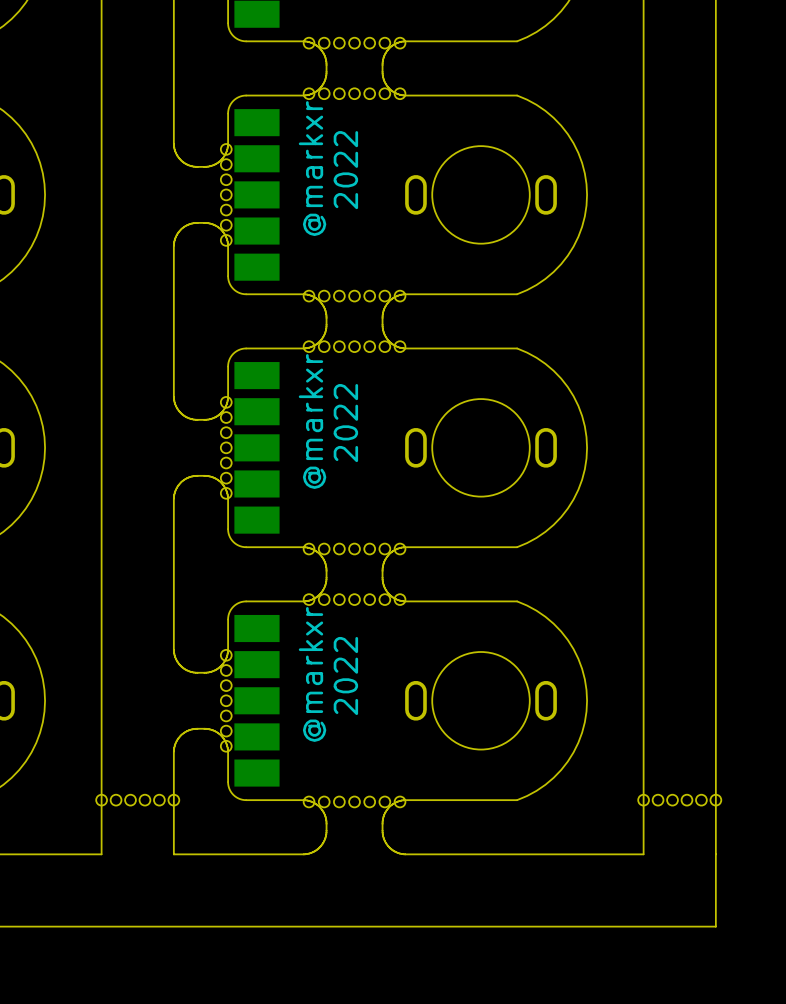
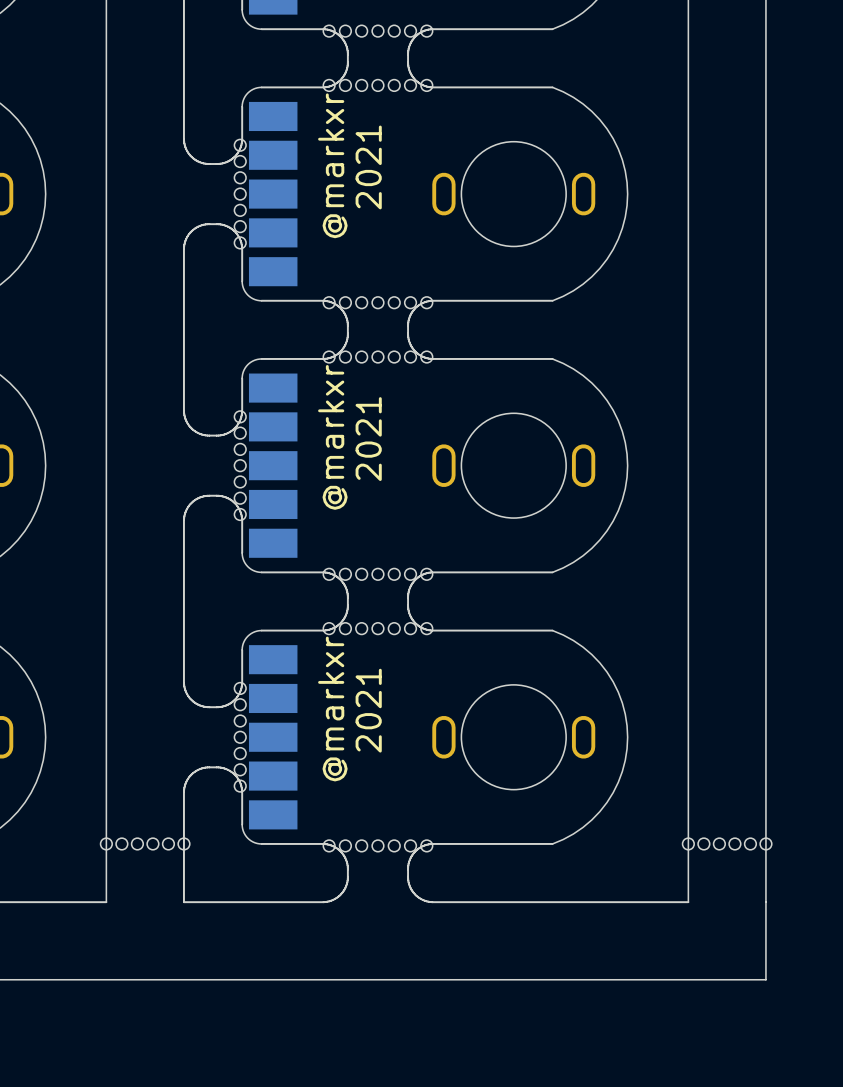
text: 2022 (345, 170) -> 2021 (368, 167)
text: 2022 (345, 423) -> 2021 (368, 439)
text: 2022 (345, 676) -> 2021 (368, 710)

